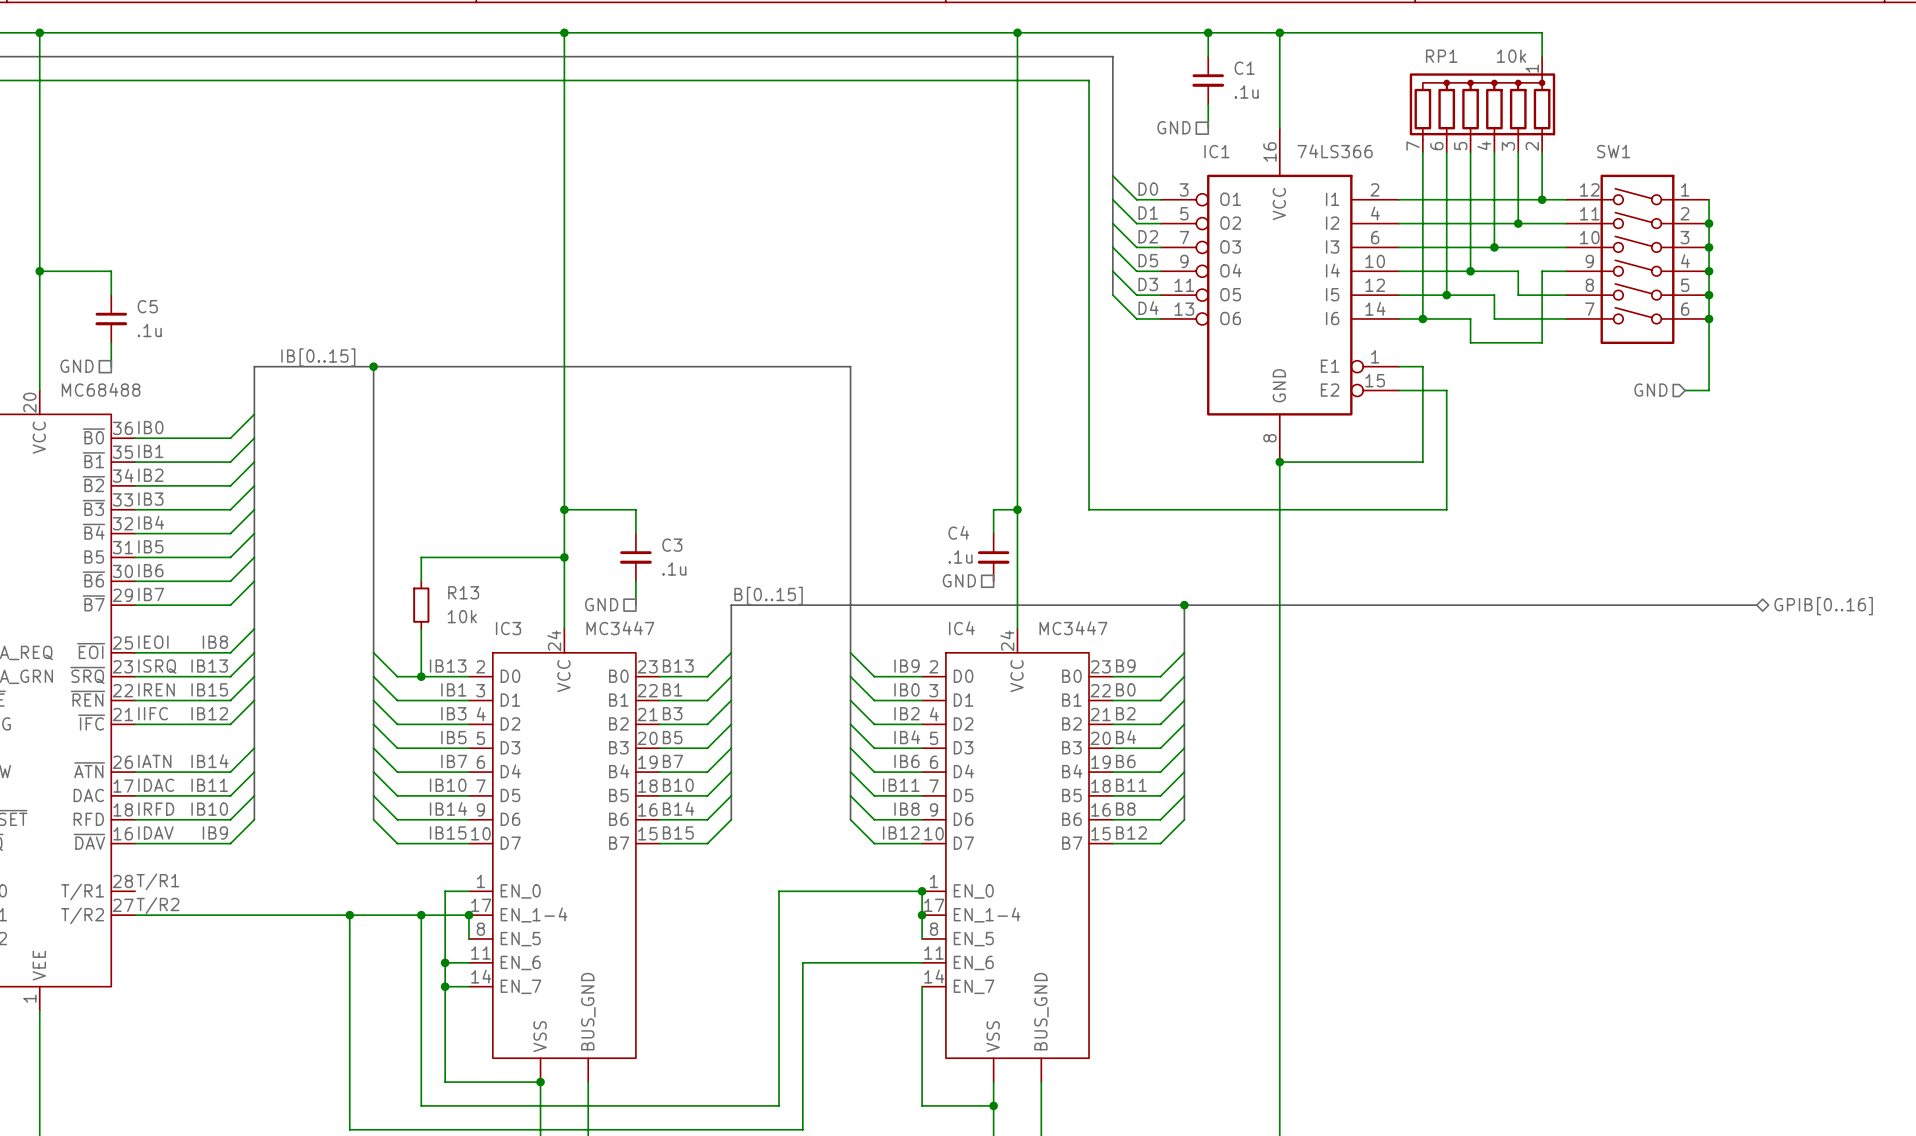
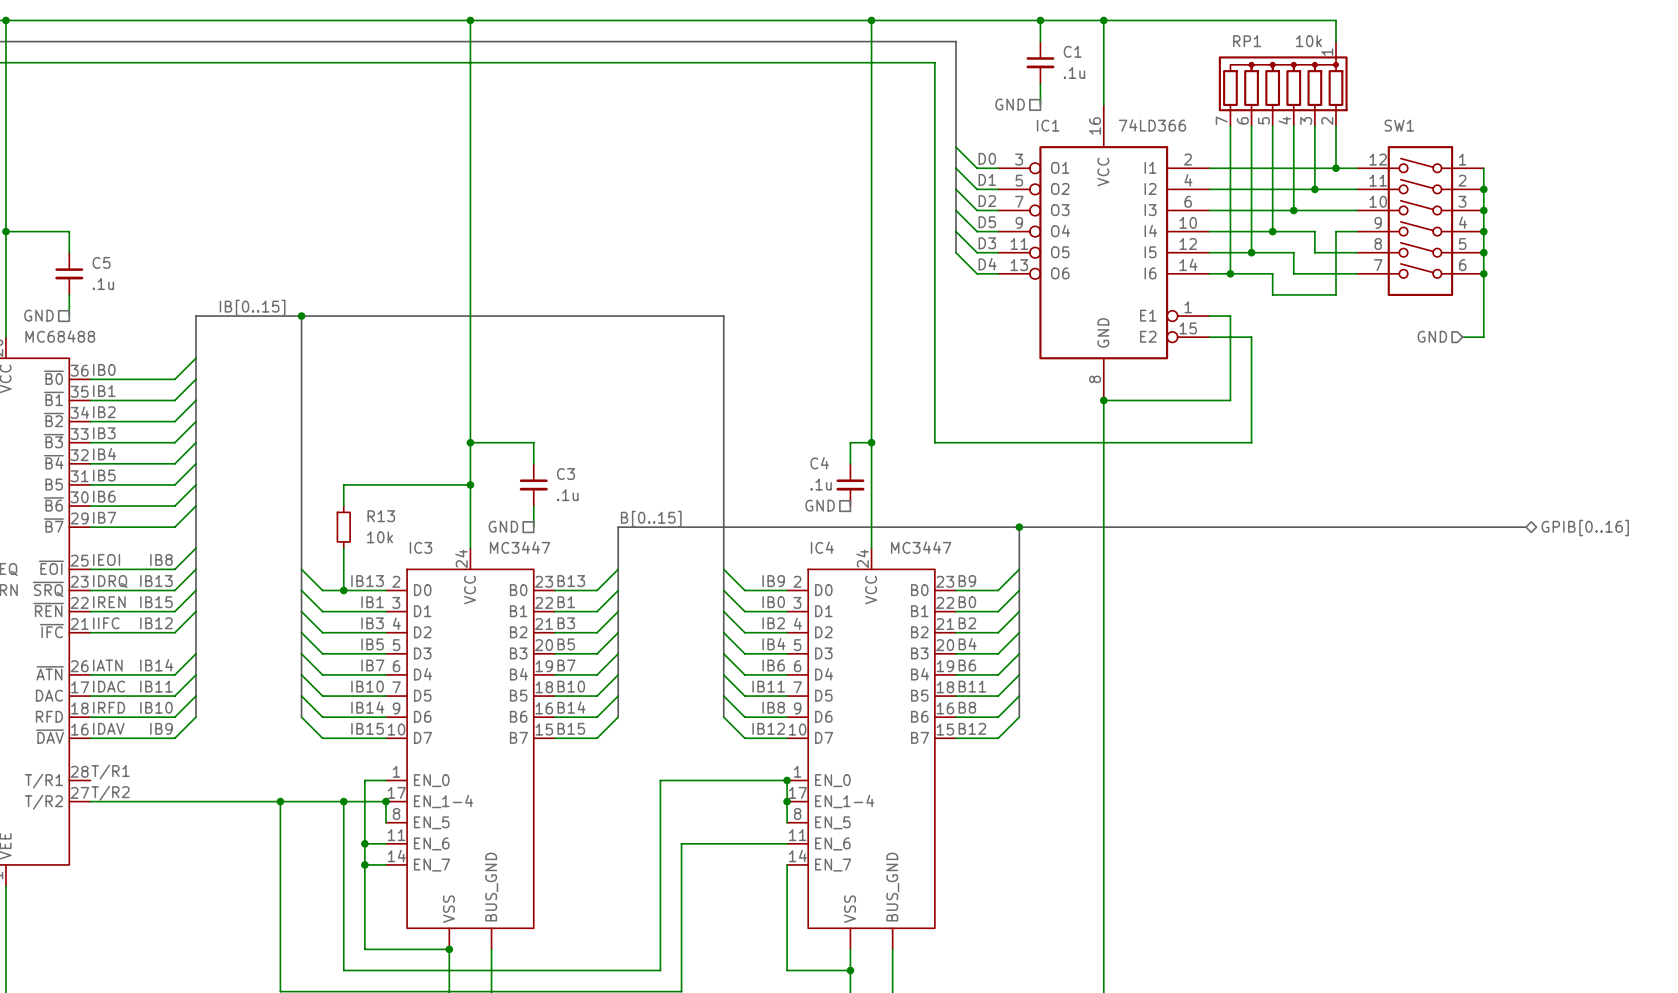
IC1 value: 74LS366 (1335, 151) -> 74LD366 (1152, 125)
label: ISRQ (157, 666) -> IDRQ (110, 581)

